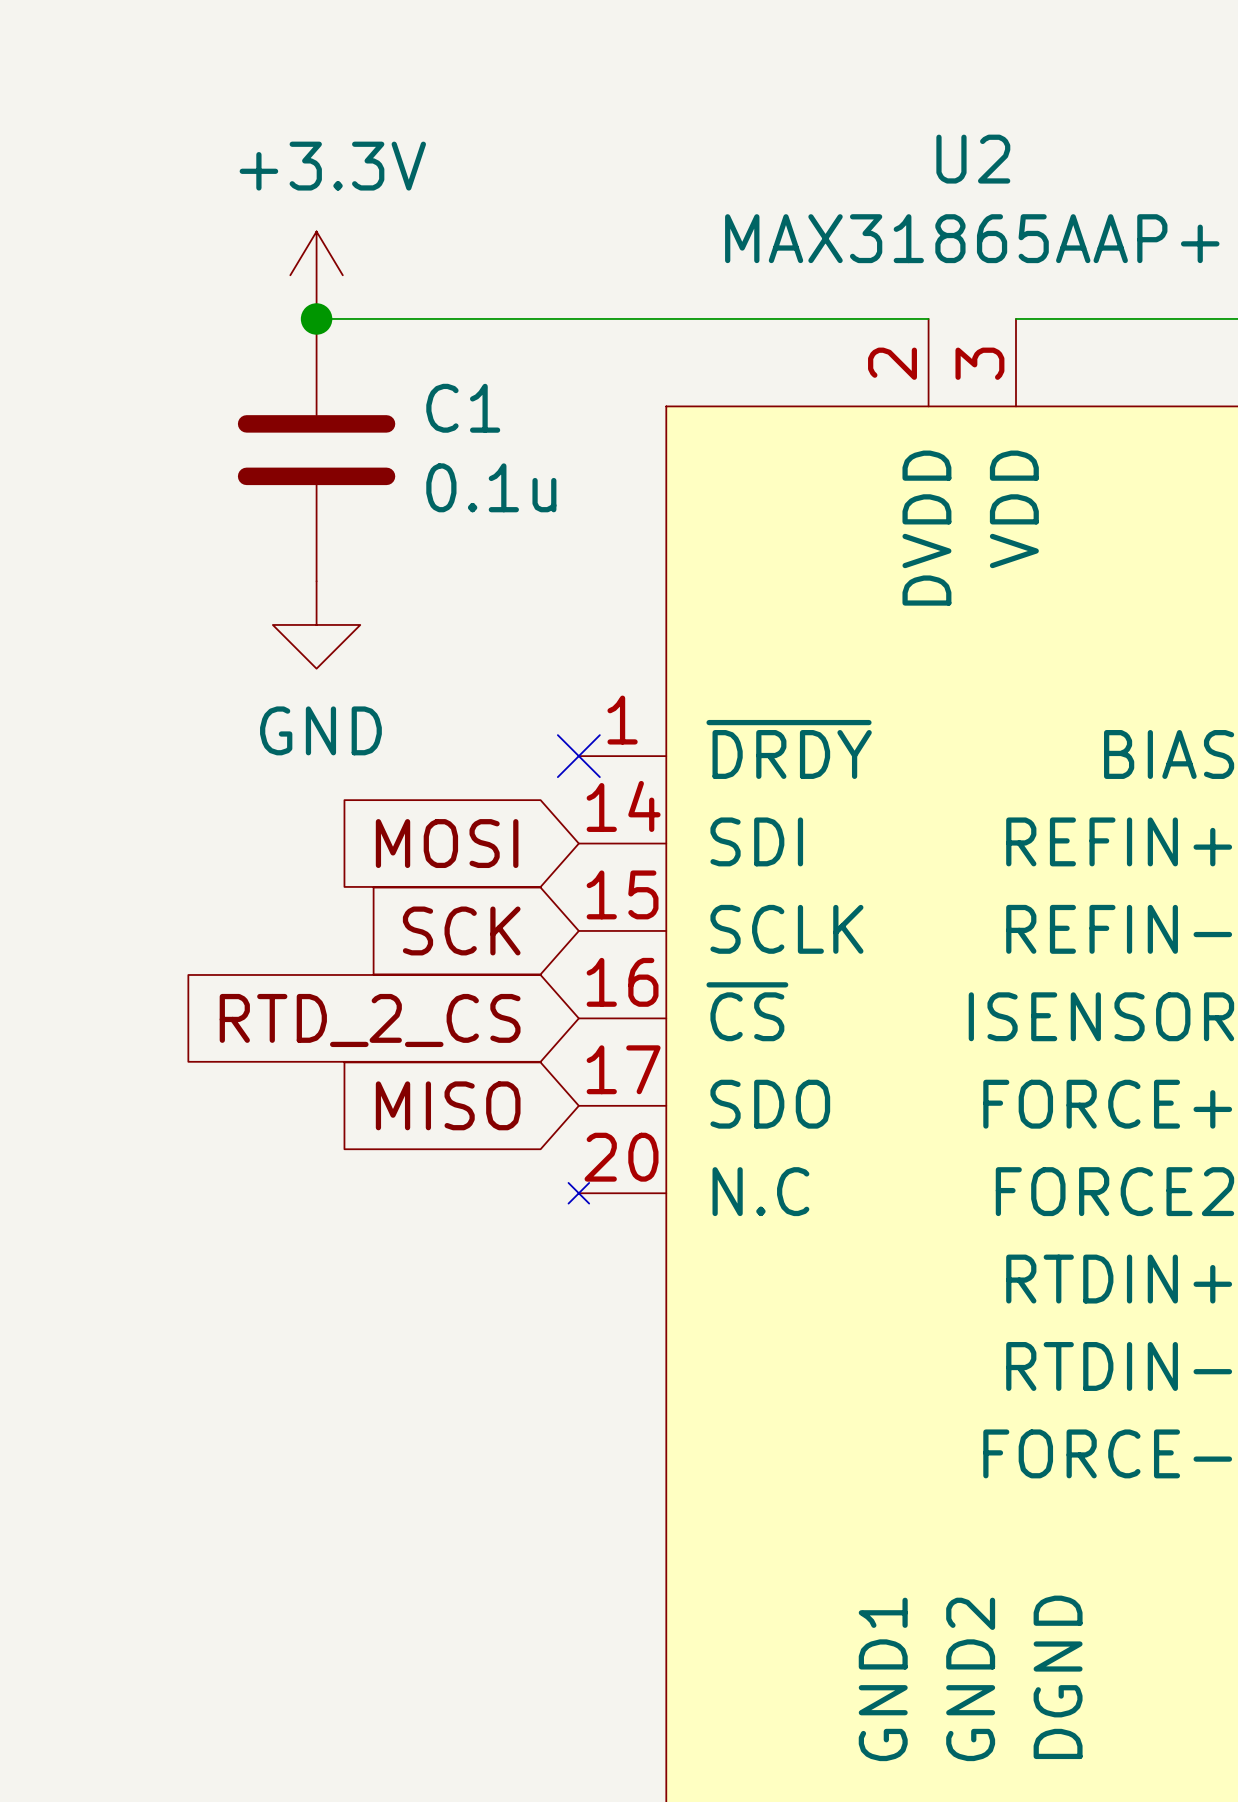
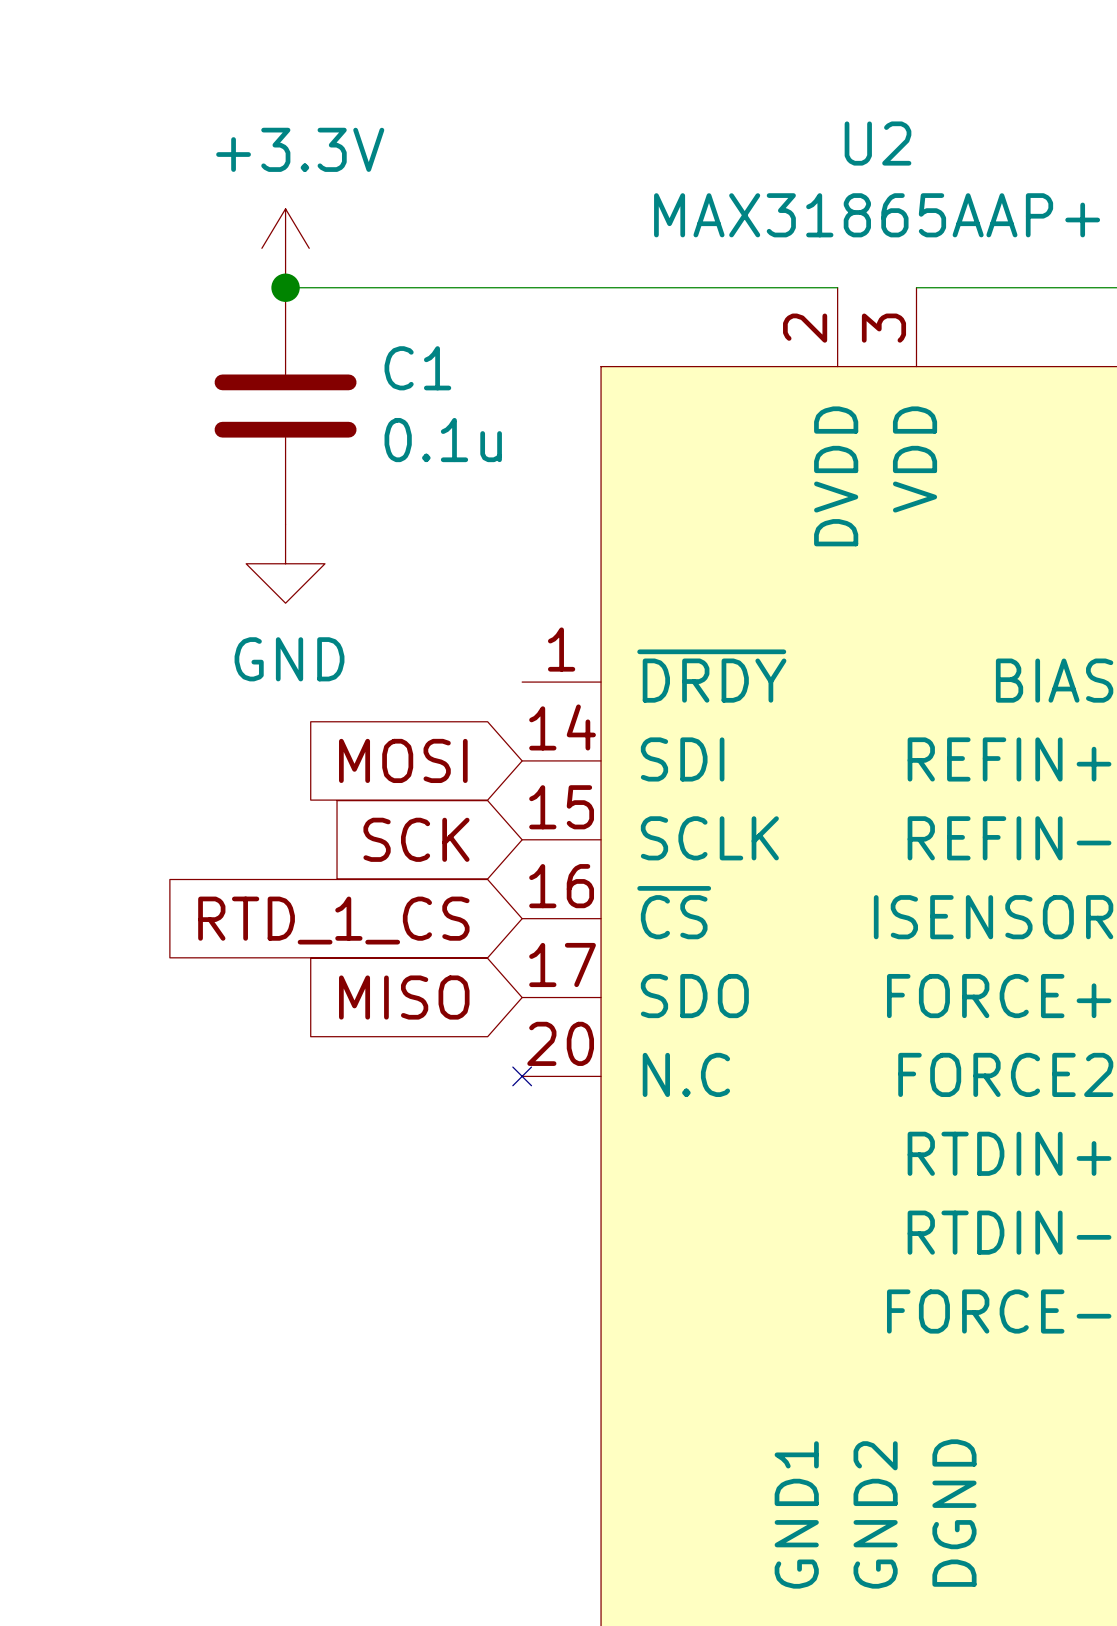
no-connect mark: (578, 756) -> none
global label: RTD_2_CS (370, 1020) -> RTD_1_CS (333, 920)

